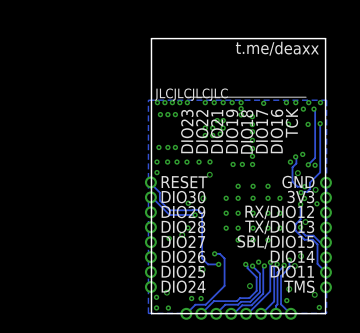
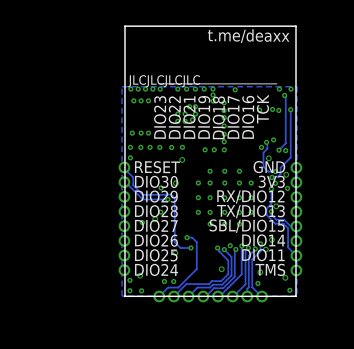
via: (286, 102) -> none
via: (295, 102) -> none
via: (303, 109) -> none
via: none -> (272, 109)

